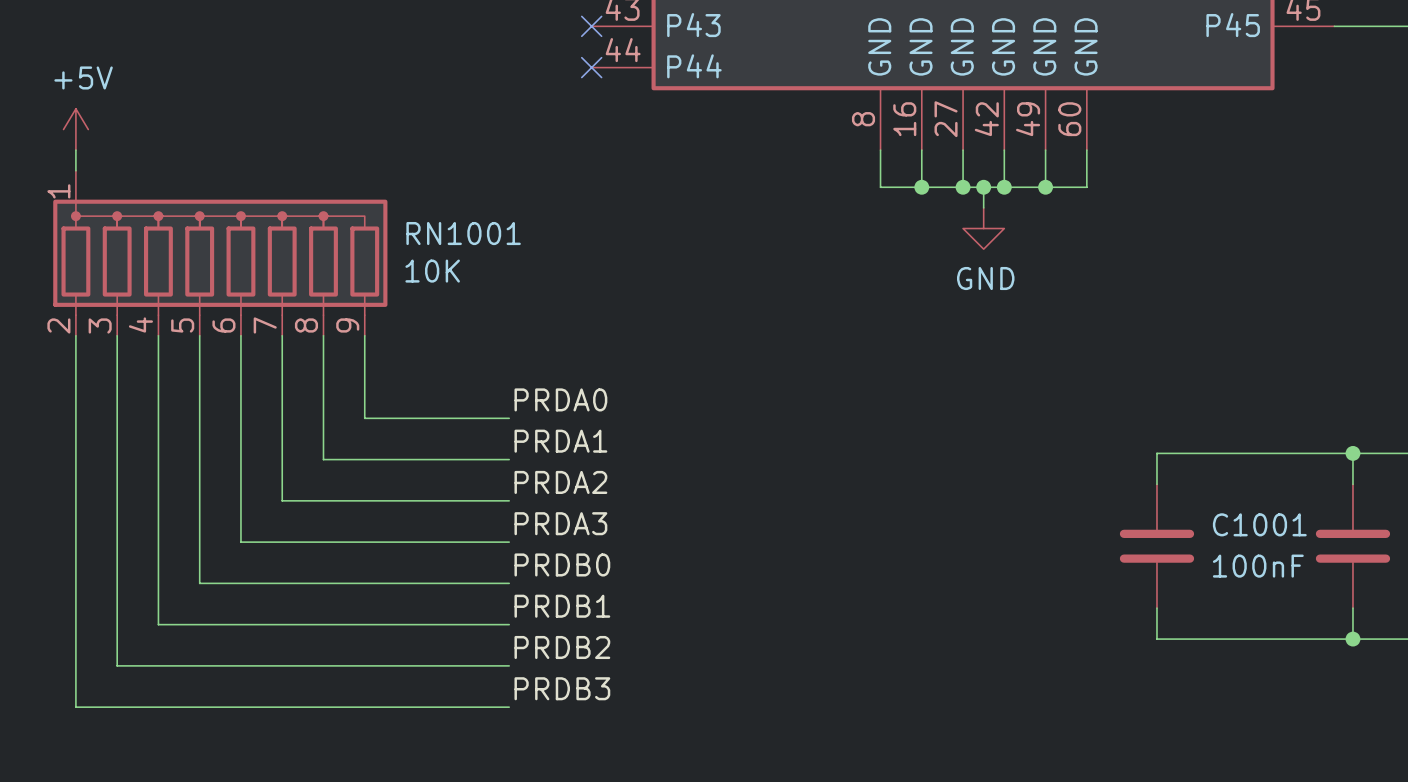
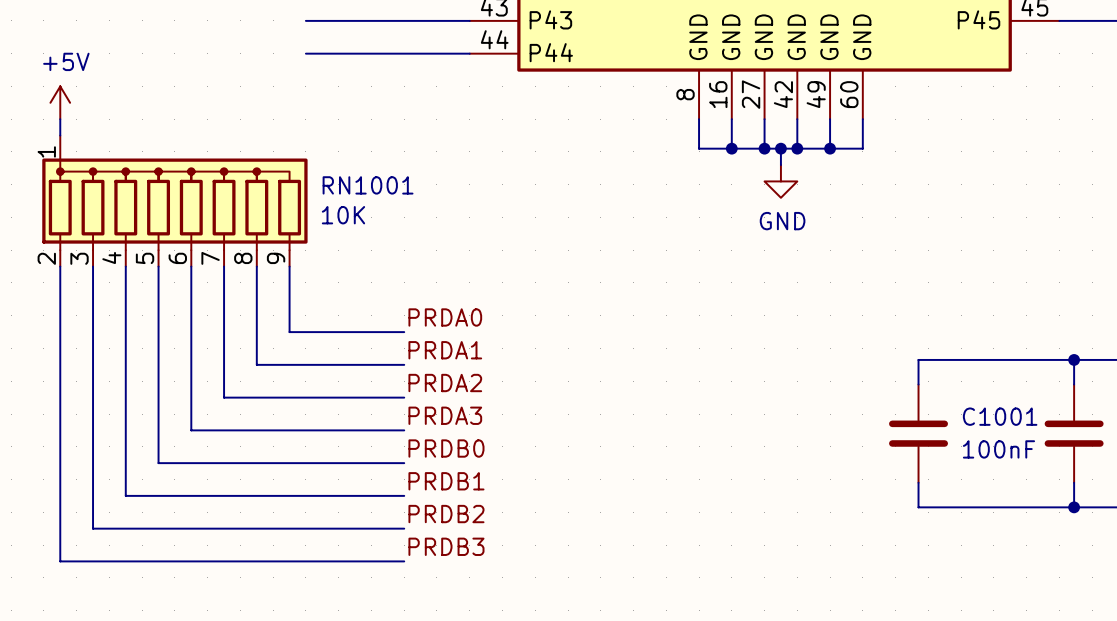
wire: none -> (305, 20) (469, 20)
no-connect mark: (591, 26) -> none
wire: none -> (305, 53) (469, 53)
no-connect mark: (591, 67) -> none

